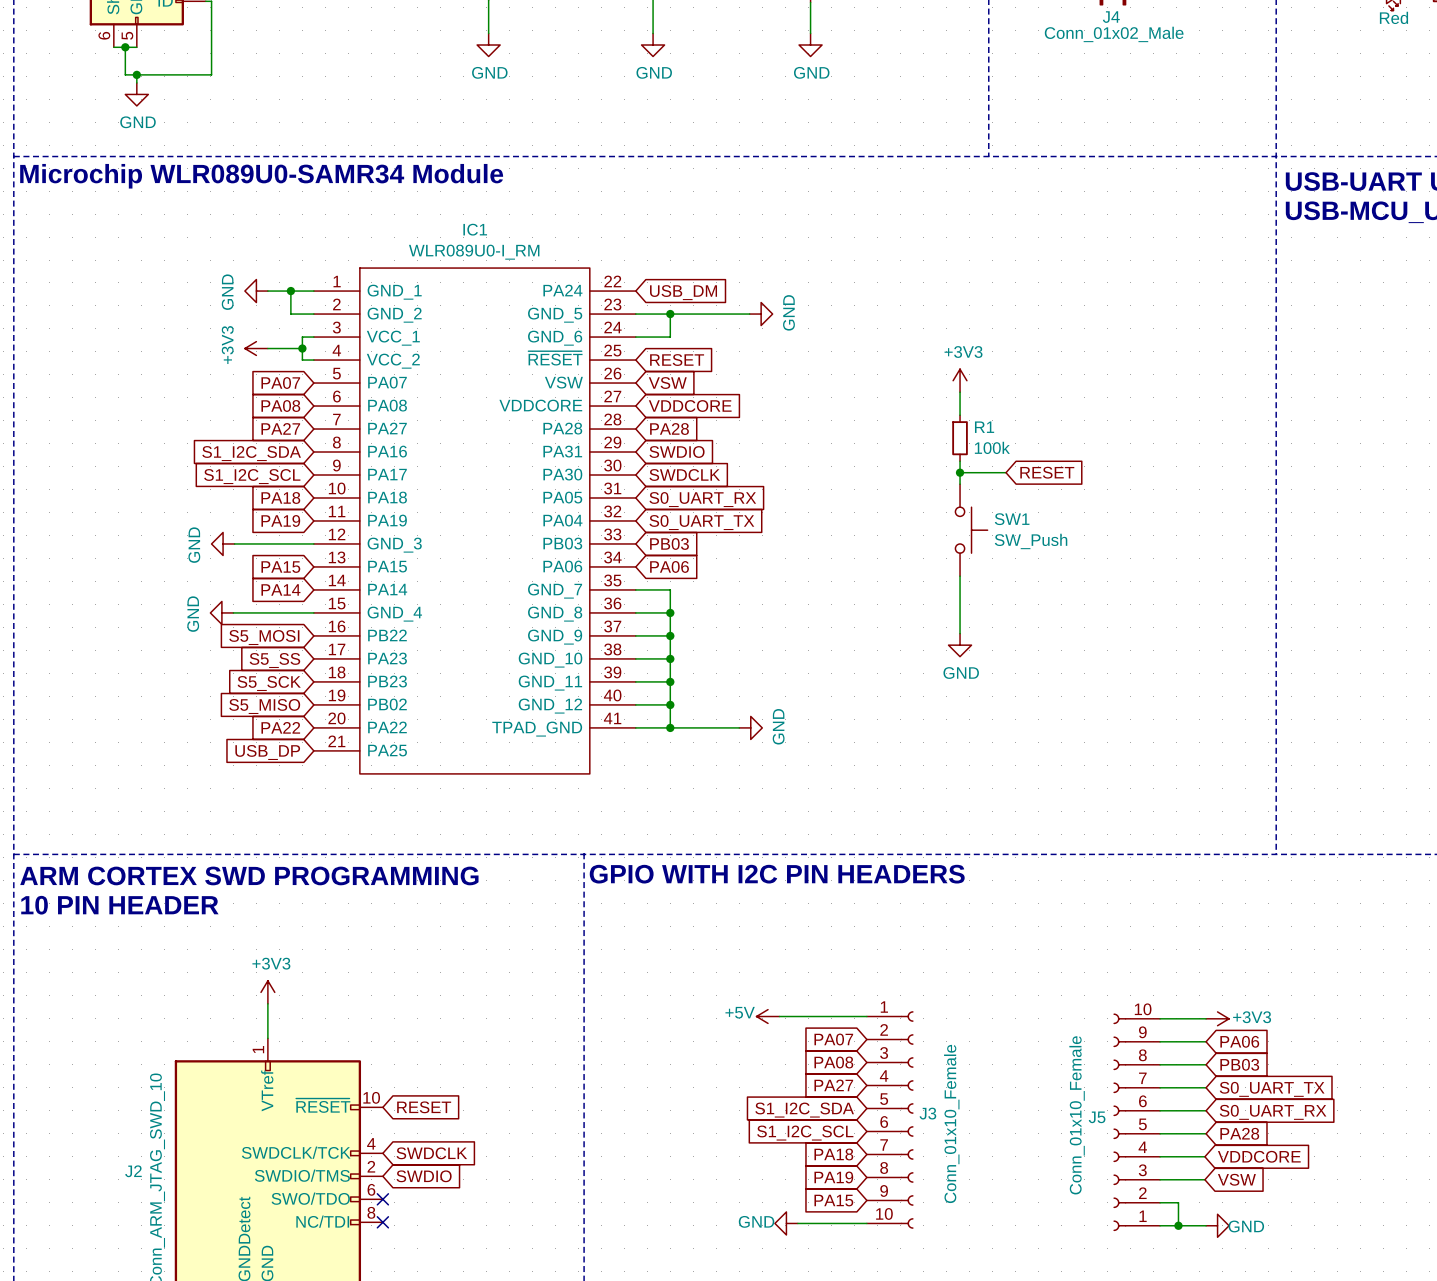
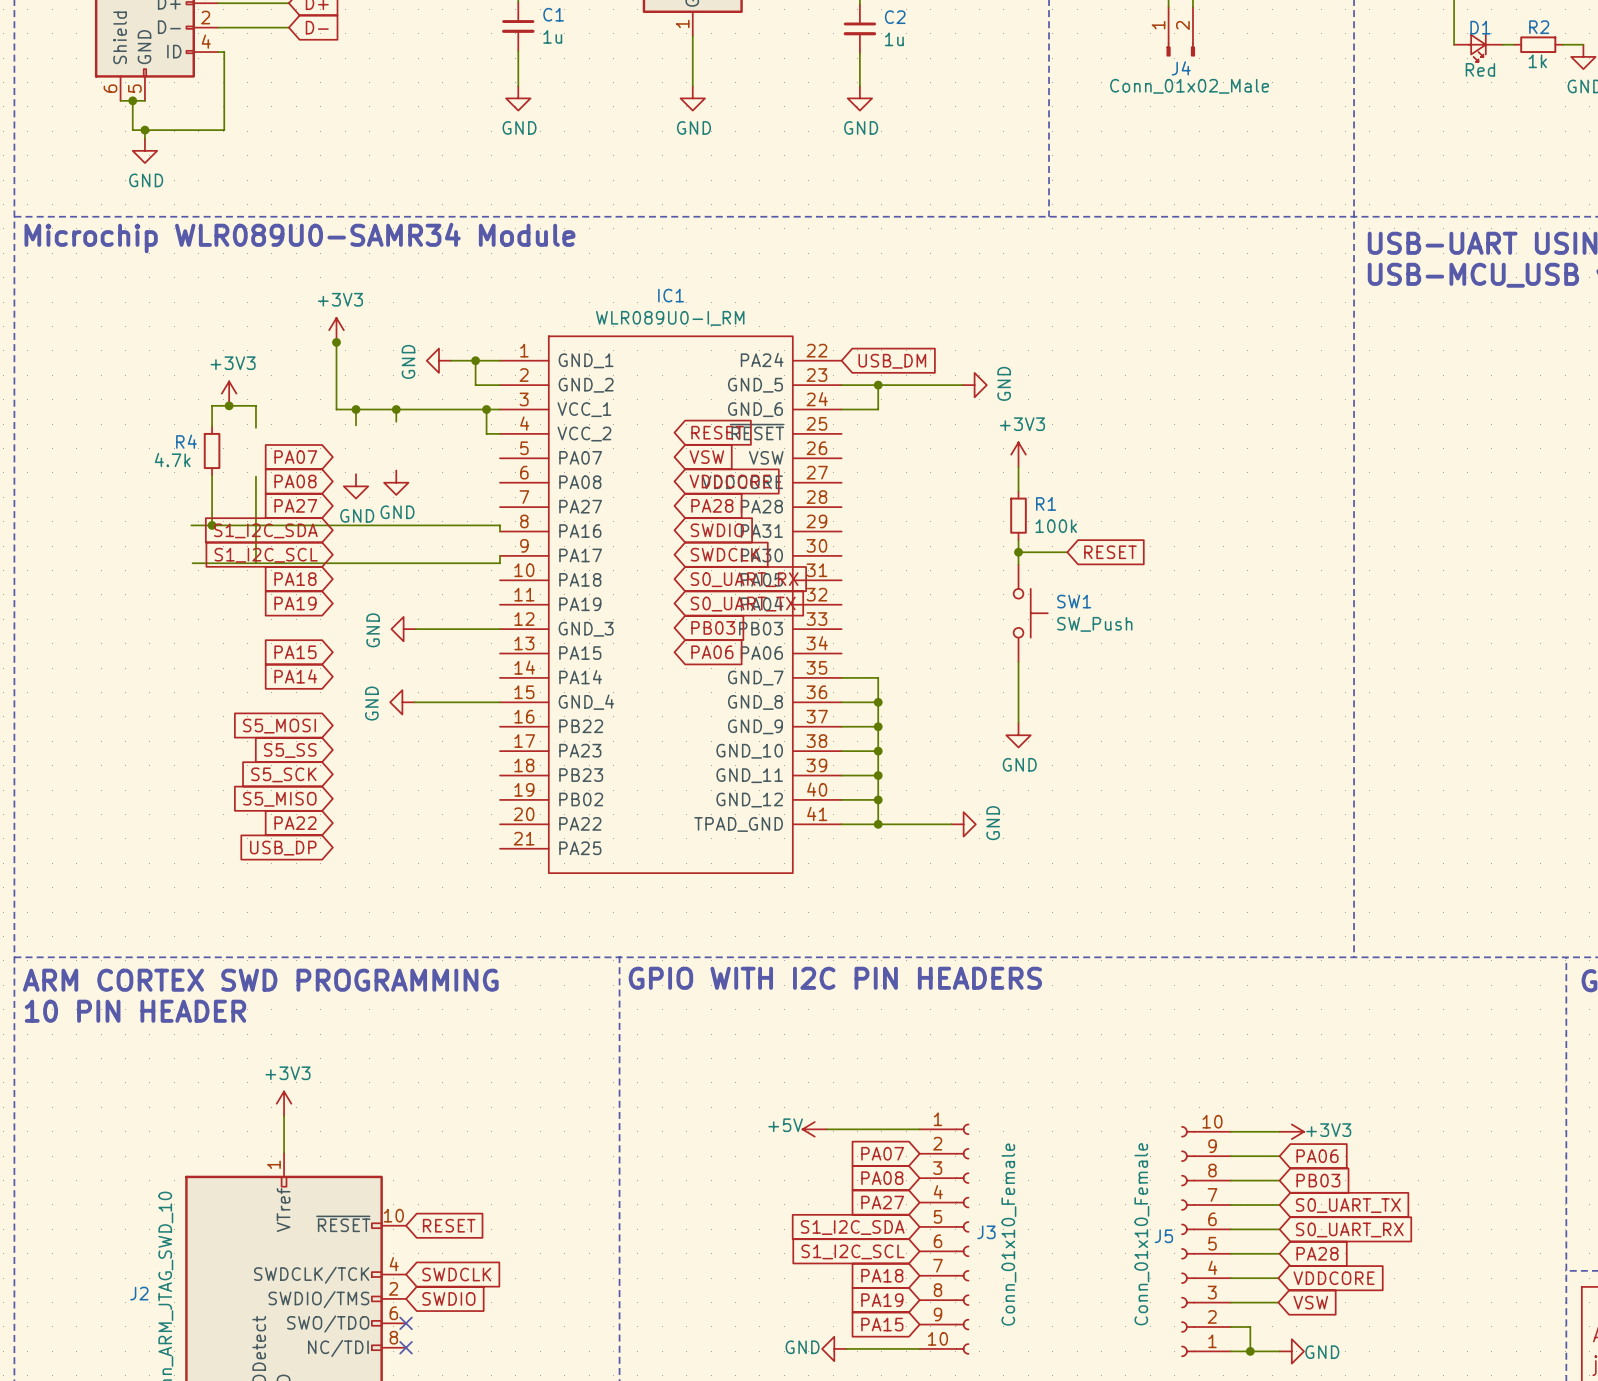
power symbol: none -> +3V3 (336, 330)
wire: none -> (336, 341) (336, 409) (499, 409)
power symbol: GND (256, 291) -> none
wire: (267, 291) (313, 291) -> (451, 360) (499, 360)
wire: (290, 291) (290, 314) (313, 314) -> (475, 360) (475, 385) (499, 385)
junction position: (290, 291) -> (336, 342)
power symbol: none -> GND (438, 360)
junction: none -> (475, 360)
global label position: USB_DM (683, 292) -> USB_DM (892, 361)
wire: (635, 314) (749, 314) -> (841, 385) (962, 385)
wire: (670, 314) (670, 337) (635, 337) -> (878, 385) (878, 409) (841, 409)
junction: (670, 314) -> none
power symbol position: GND (761, 314) -> GND (974, 385)
junction: none -> (878, 385)
junction: none -> (229, 405)
wire: (313, 337) (302, 337) (302, 360) (313, 360) -> none
wire: none -> (356, 409) (356, 425)
junction: none -> (356, 409)
wire: none -> (396, 409) (396, 421)
junction: none -> (396, 409)
wire: none -> (486, 409) (486, 433) (499, 433)
junction: none -> (486, 409)
power symbol rotation: 0° (256, 348) -> 90° clockwise (229, 393)
power symbol position: +3V3 (256, 348) -> +3V3 (229, 393)
wire: (267, 348) (302, 348) -> none
junction: (302, 348) -> none
wire: none -> (212, 426) (212, 405) (255, 405) (255, 427)
R4: none -> 4.7k (212, 450)
wire: none -> (212, 475) (212, 525)
wire: none -> (255, 476) (255, 563)
power symbol: none -> GND (396, 482)
power symbol: none -> GND (356, 486)
wire: none -> (191, 525) (499, 525) (499, 531)
junction: none -> (212, 525)
wire: none -> (499, 555) (499, 563) (192, 563)
IC1 position: (474, 520) -> (670, 604)
power symbol: GND (223, 543) -> none
wire: (234, 543) (313, 543) -> (415, 629) (499, 629)
power symbol: none -> GND (403, 629)
wire: (635, 589) (670, 589) (670, 727) -> (841, 677) (878, 677) (878, 824)
power symbol: GND (221, 612) -> none
wire: (233, 612) (313, 612) -> (414, 702) (499, 702)
wire: (635, 612) (670, 612) -> (841, 702) (878, 702)
junction: (670, 612) -> none
power symbol: none -> GND (402, 702)
junction: none -> (878, 702)
wire: (635, 635) (670, 635) -> (841, 726) (878, 726)
junction: (670, 635) -> none
junction: none -> (878, 726)
wire: (635, 658) (670, 658) -> (841, 751) (878, 751)
junction: (670, 658) -> none
junction: none -> (878, 751)
wire: (635, 681) (670, 681) -> (841, 775) (878, 775)
junction: (670, 681) -> none
junction: none -> (878, 775)
wire: (635, 704) (670, 704) -> (841, 799) (878, 799)
junction: (670, 704) -> none
junction: none -> (878, 799)
wire: (635, 727) (739, 727) -> (841, 824) (951, 824)
junction: (670, 727) -> none
power symbol position: GND (750, 727) -> GND (963, 824)
junction: none -> (878, 824)

